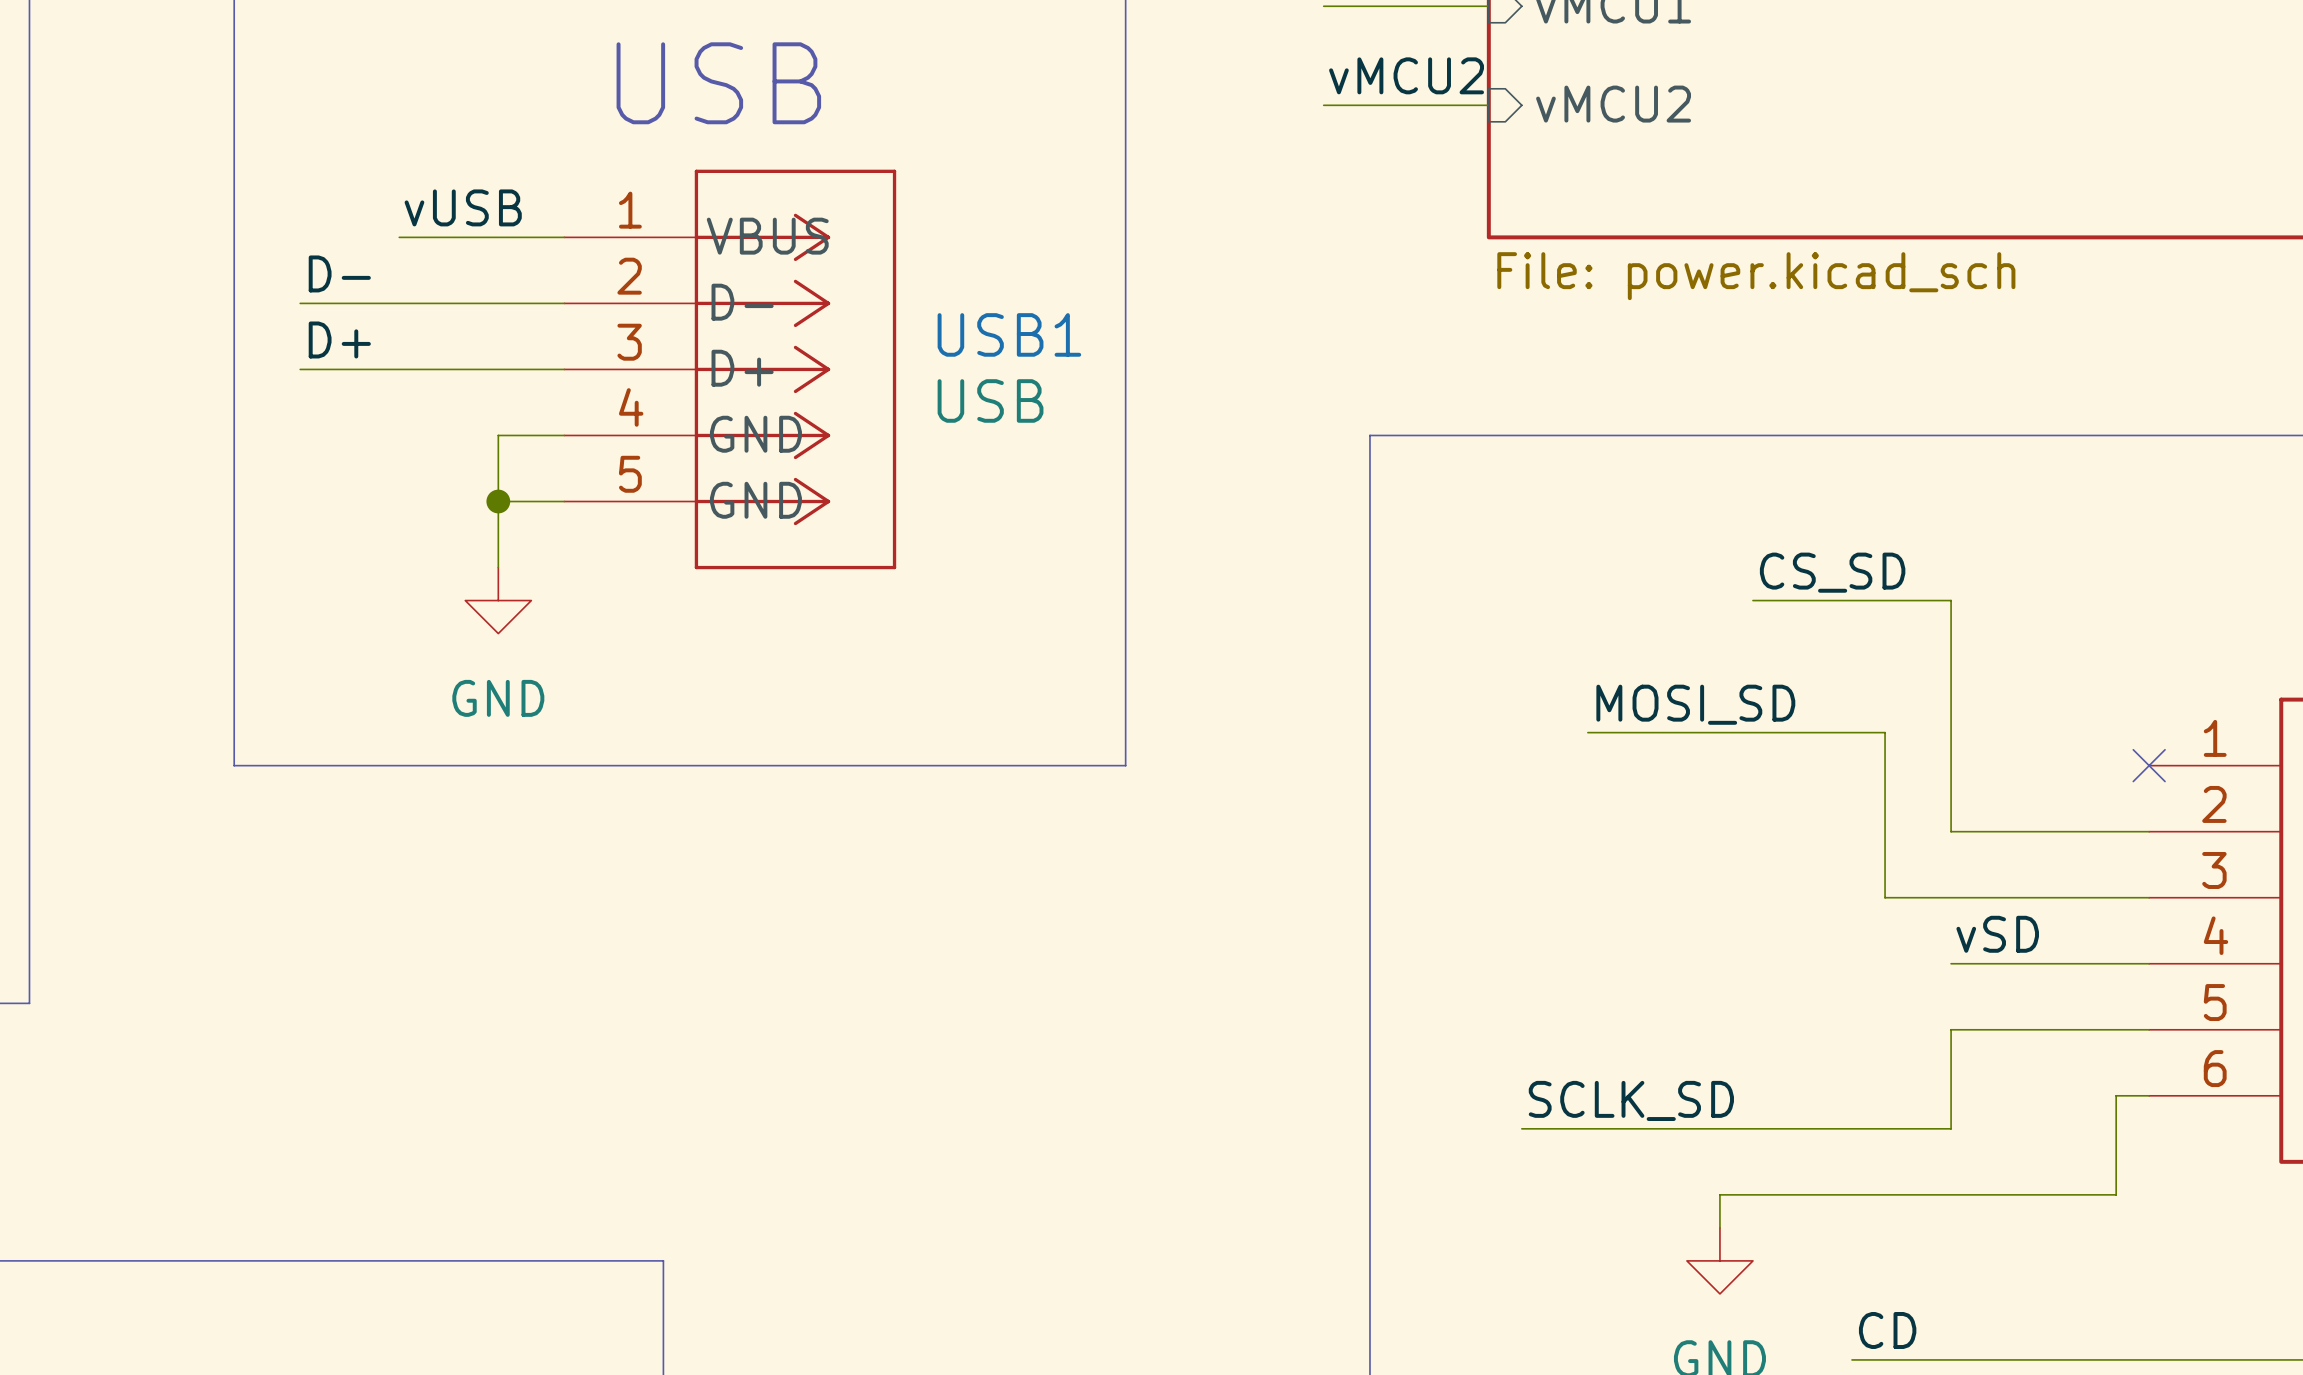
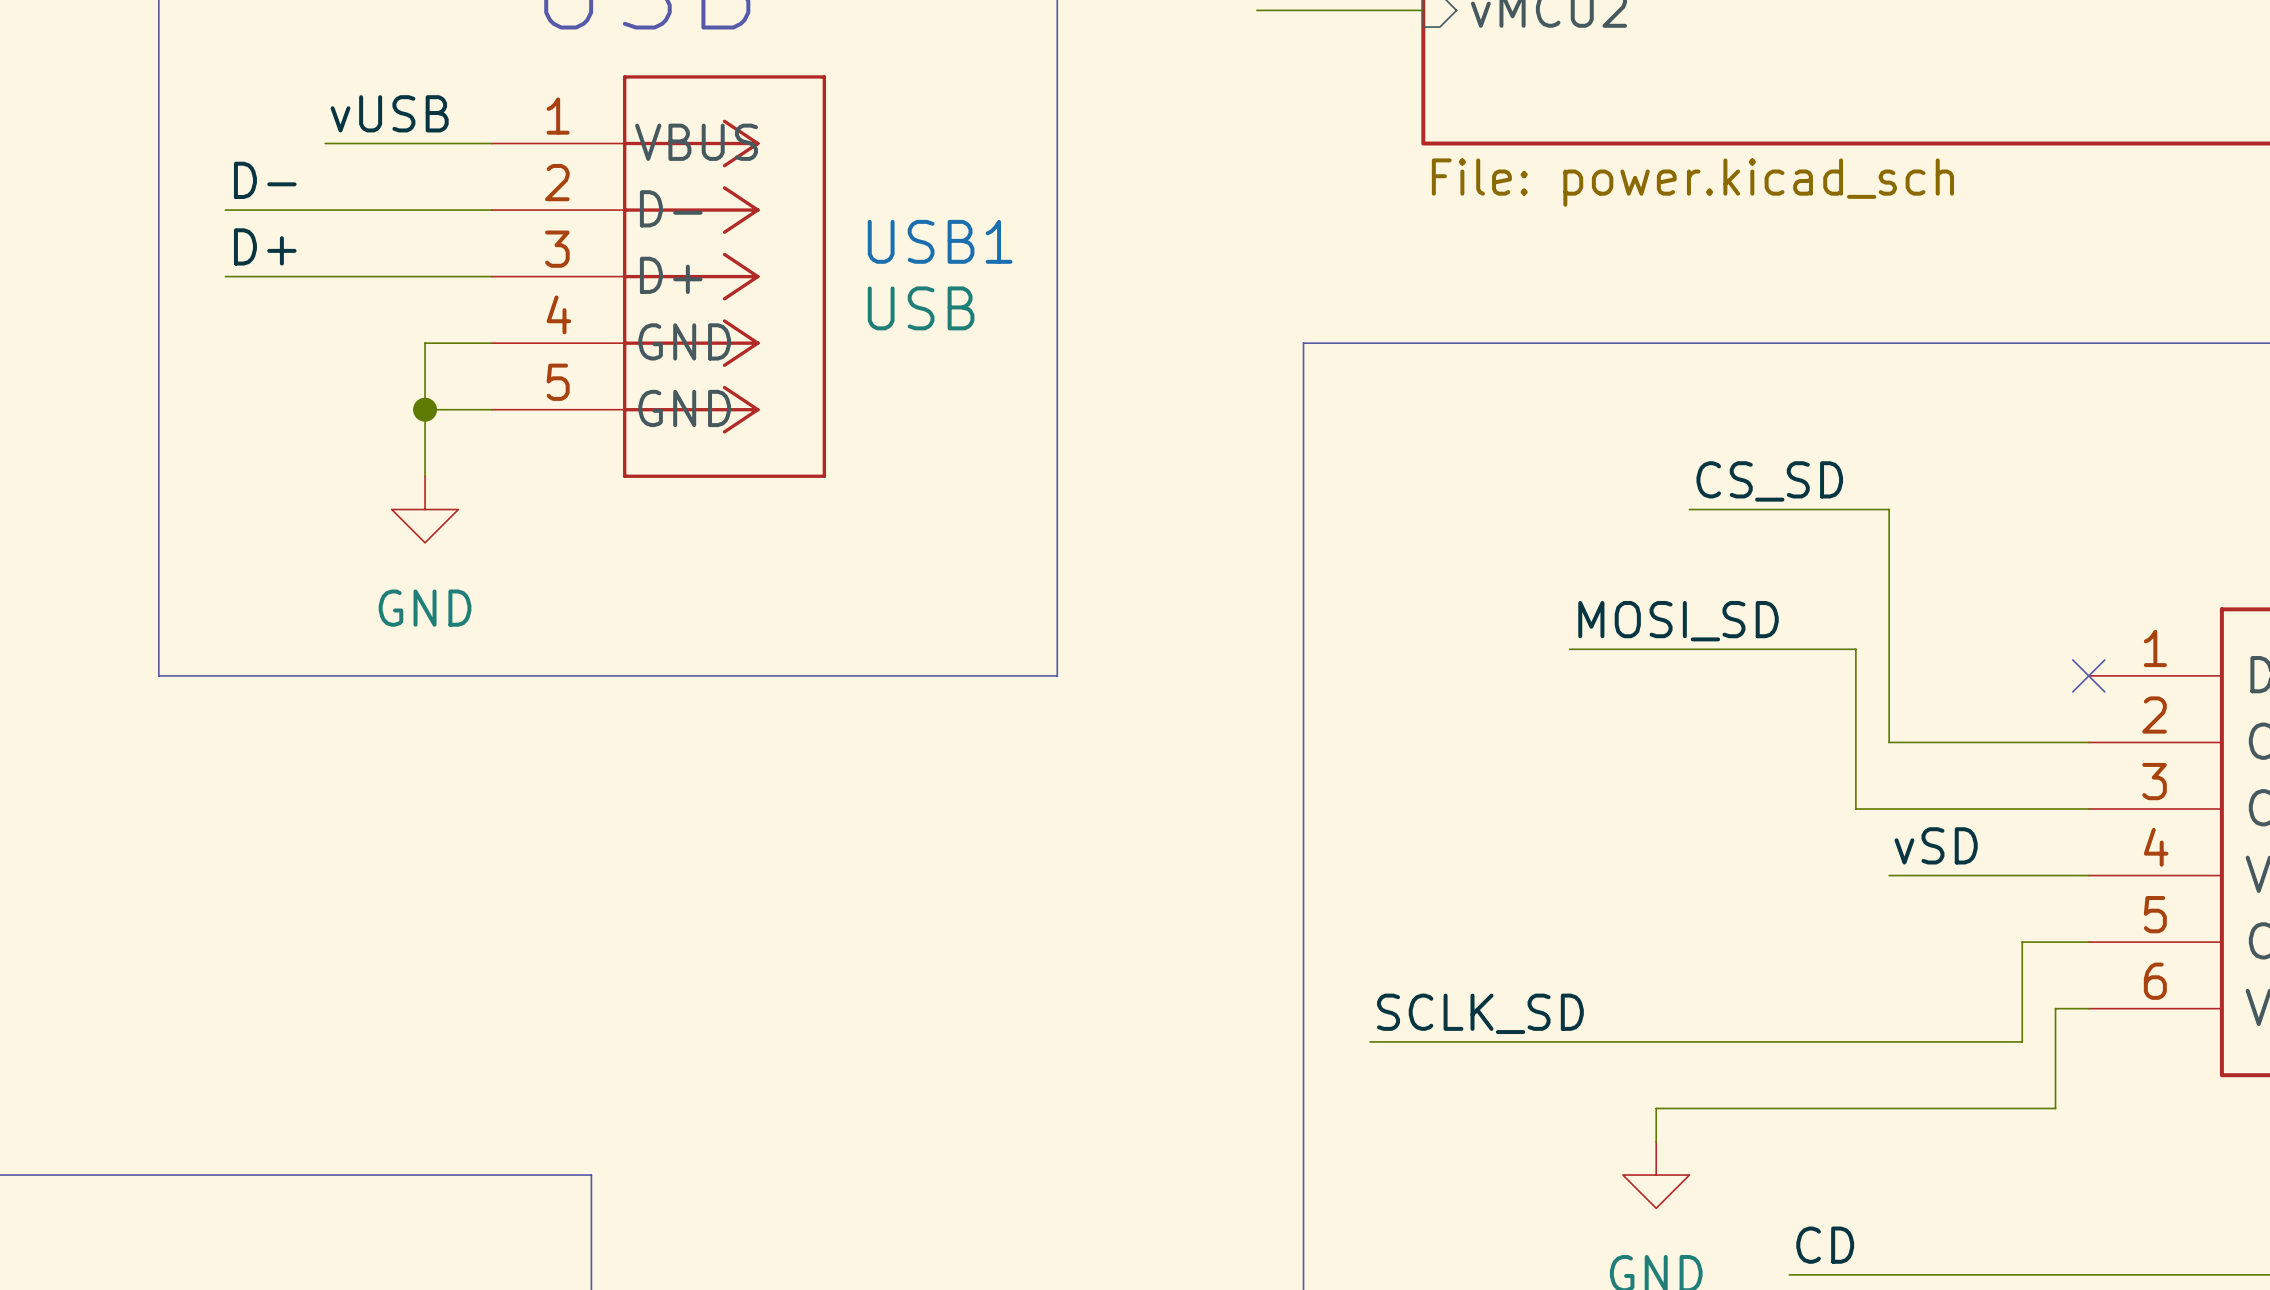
label position: MOSI_SD (1695, 704) -> MOSI_SD (1678, 621)
wire: (1587, 732) (1885, 732) (1885, 897) (1918, 897) -> (1569, 649) (1855, 649) (1855, 809)
wire: (2083, 1029) (1951, 1029) (1951, 1128) -> (2022, 942) (2022, 1041) (1889, 1041)
label position: SCLK_SD (1631, 1100) -> SCLK_SD (1480, 1013)
wire: none -> (1370, 1041) (1456, 1041)

